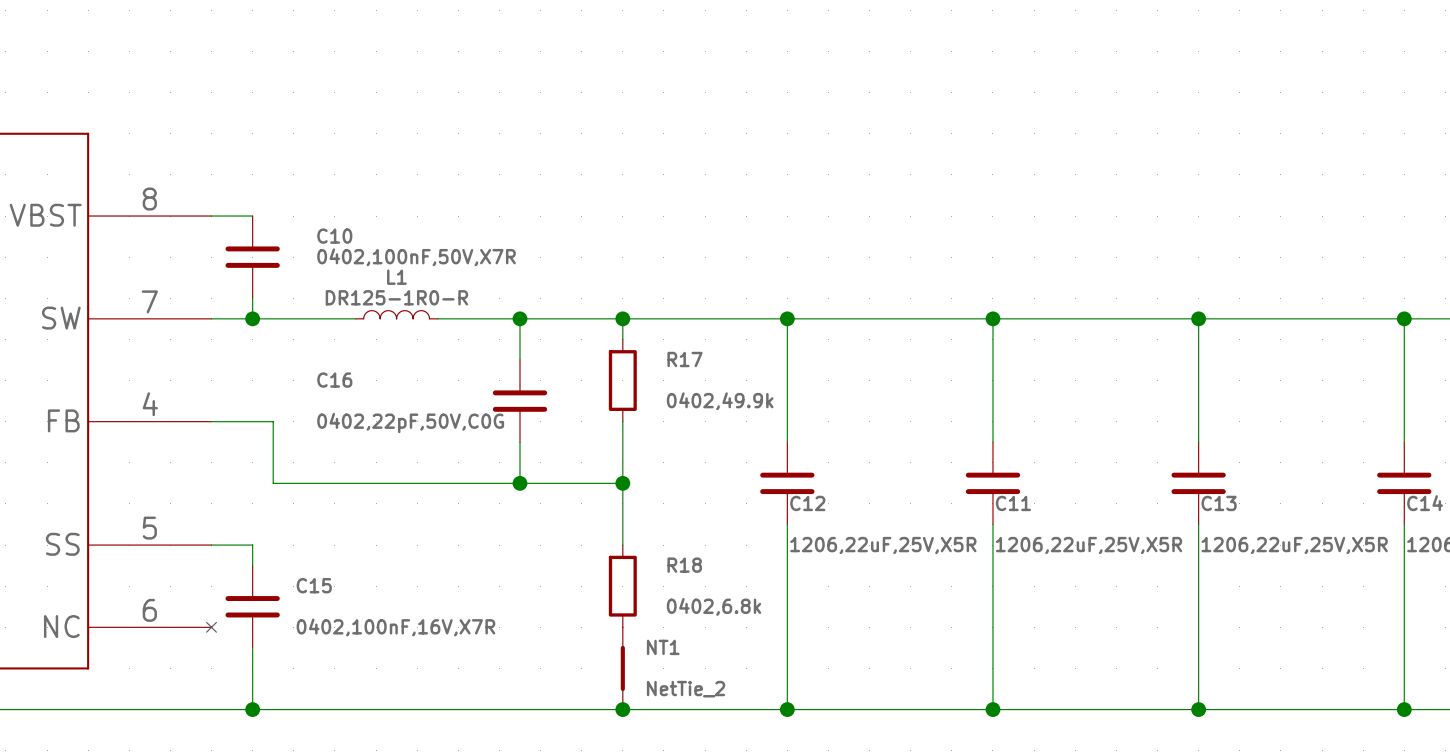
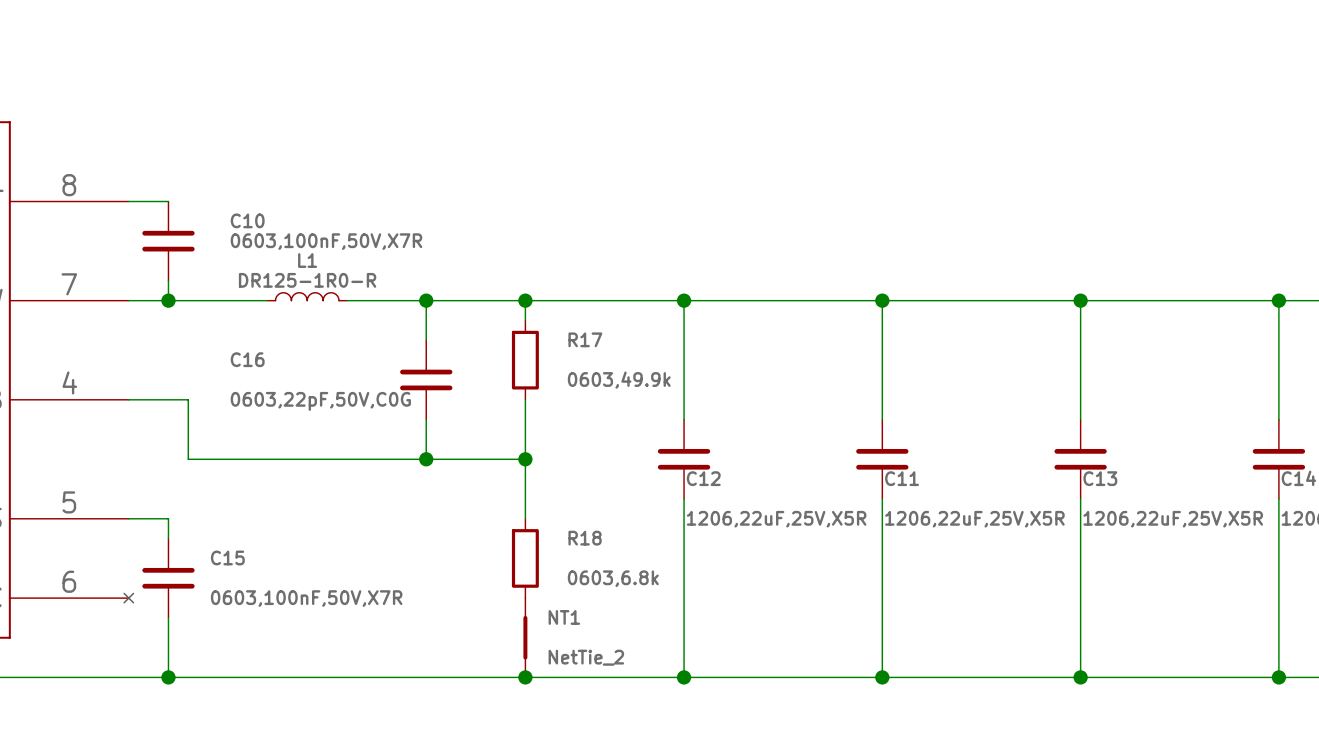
C10 value: 0402,100nF,50V,X7R (416, 257) -> 0603,100nF,50V,X7R (326, 241)
R17 value: 0402,49.9k (720, 401) -> 0603,49.9k (619, 380)
C16 value: 0402,22pF,50V,C0G (410, 423) -> 0603,22pF,50V,C0G (320, 401)
R18 value: 0402,6.8k (714, 606) -> 0603,6.8k (613, 578)
C15 value: 0402,100nF,16V,X7R (395, 627) -> 0603,100nF,50V,X7R (306, 598)

